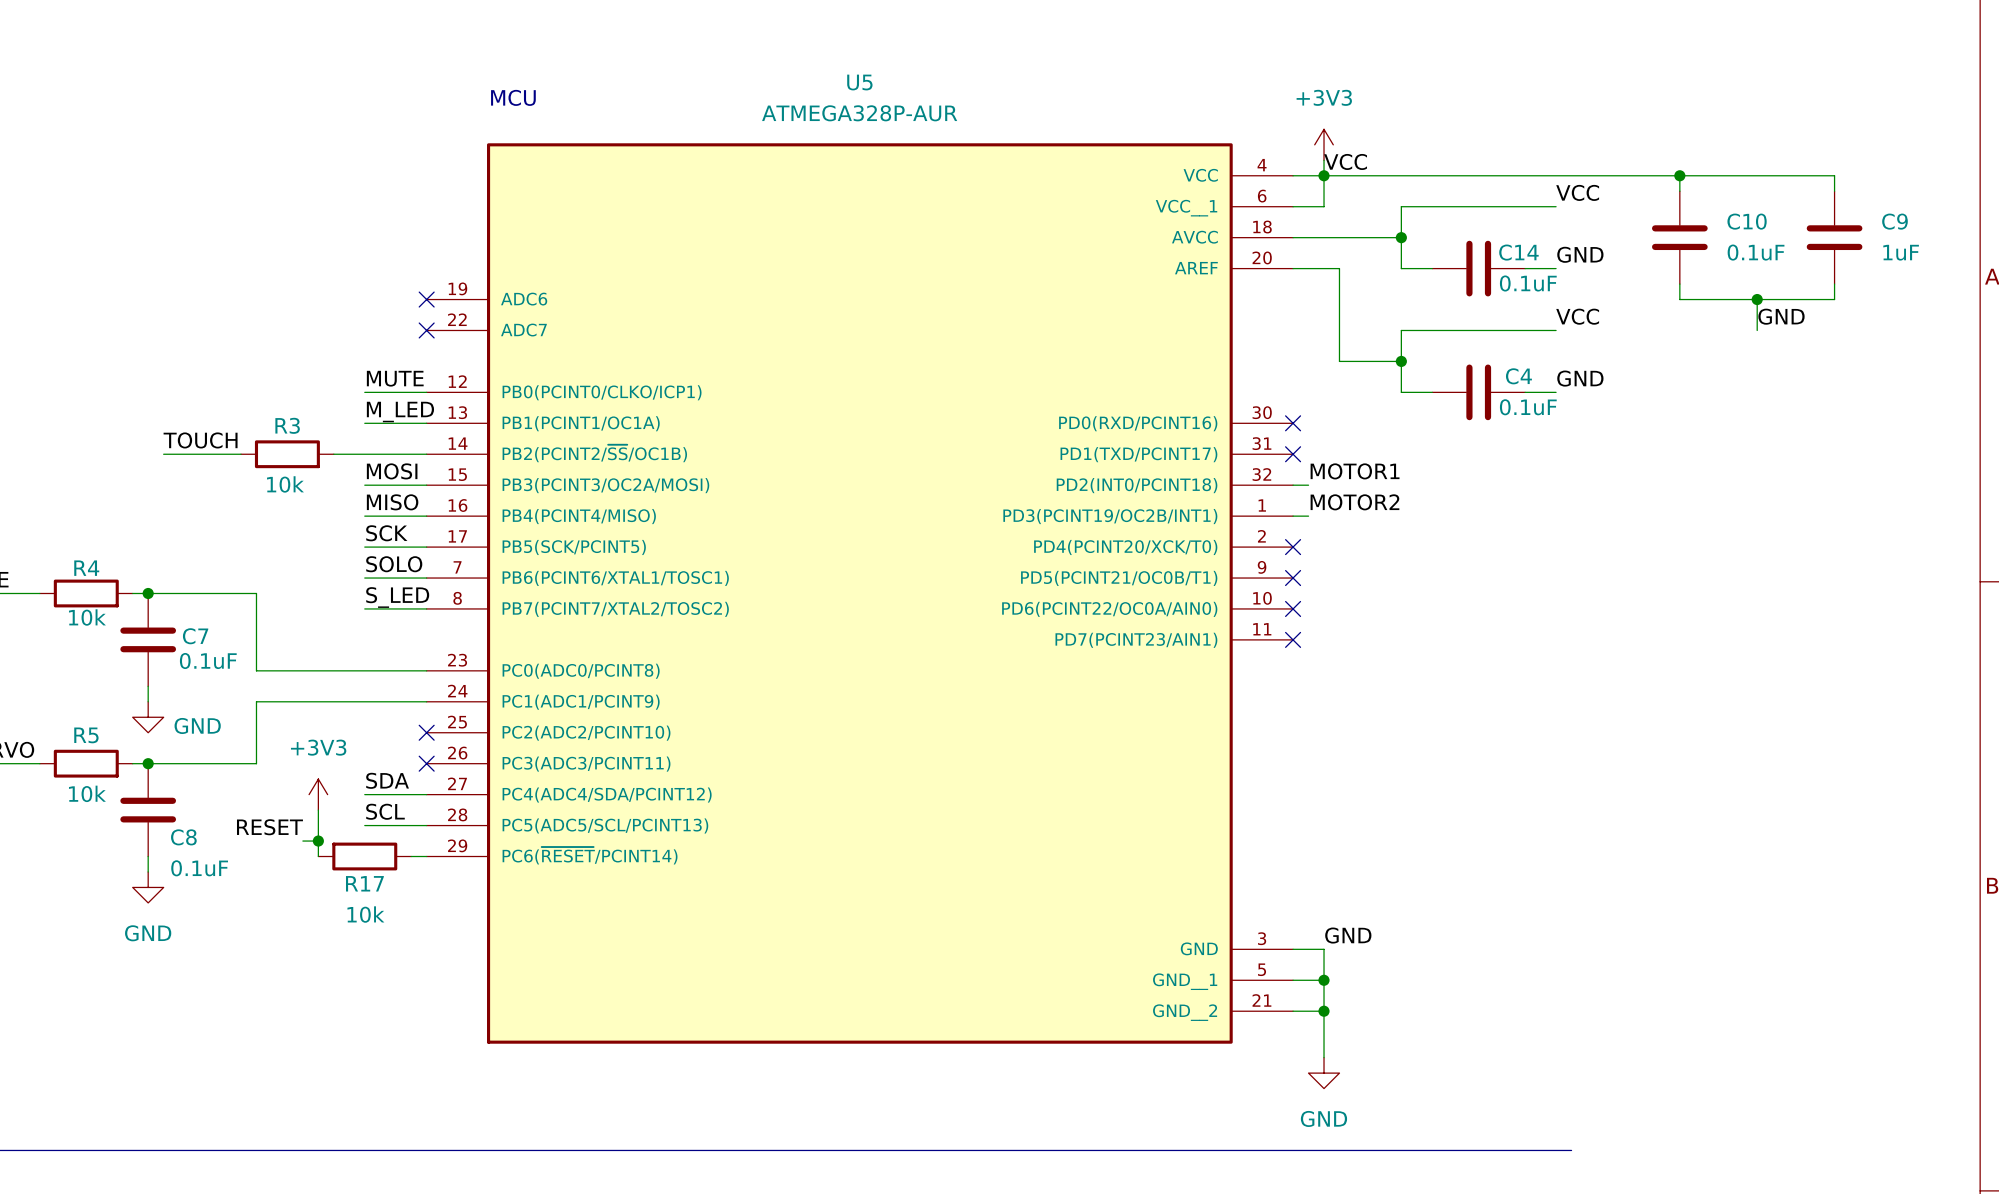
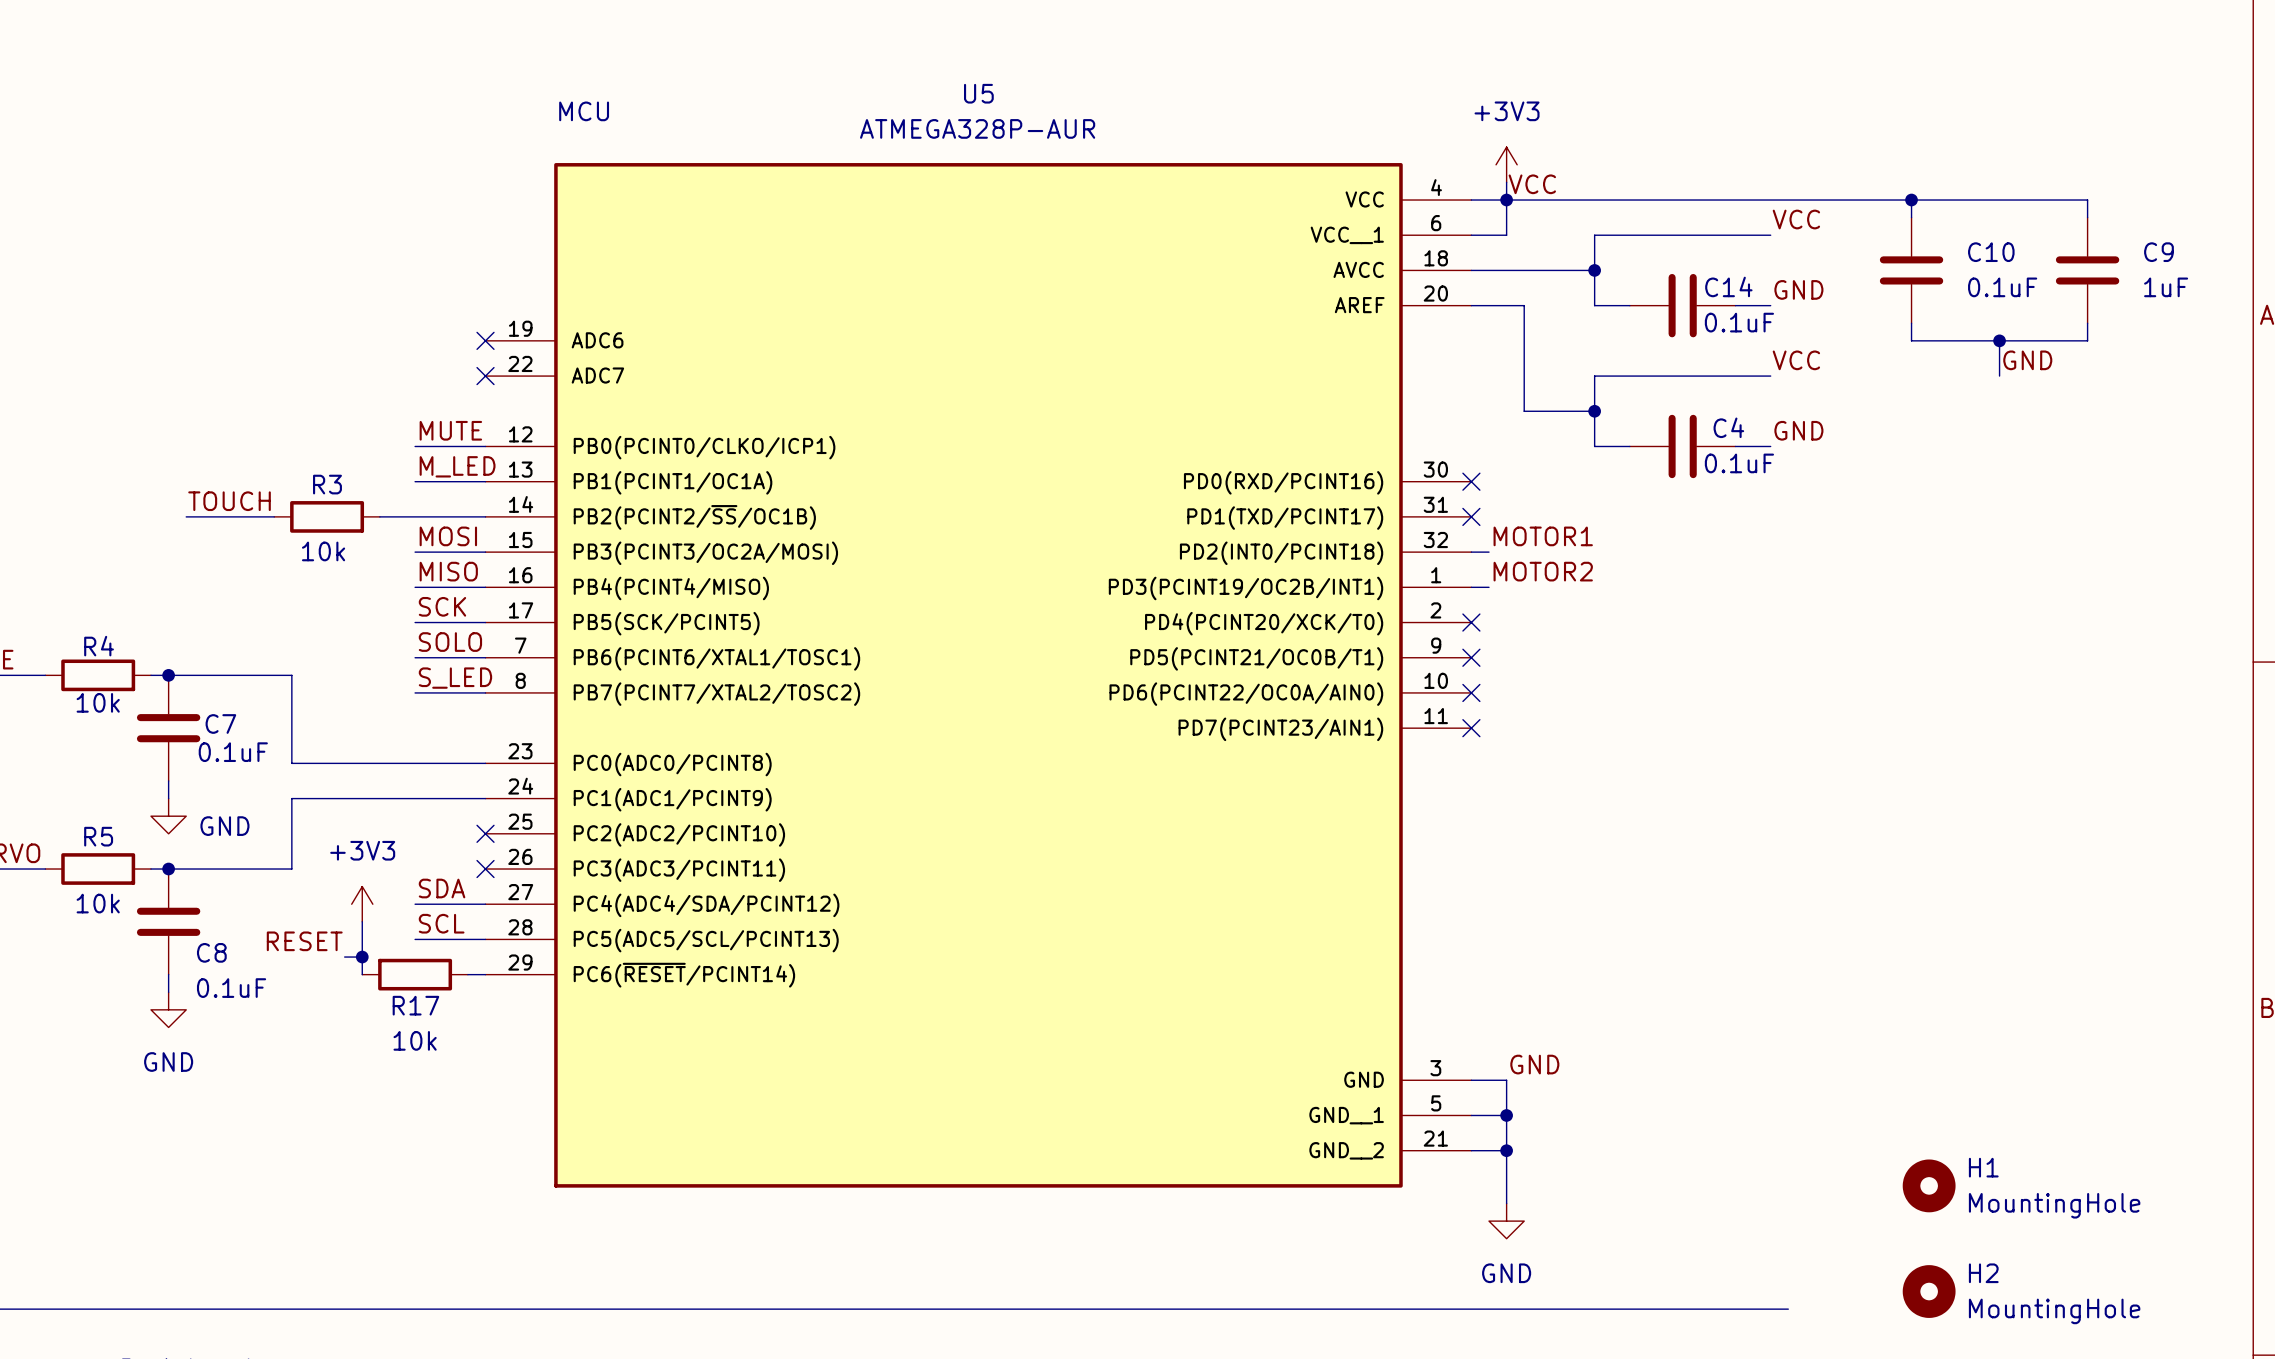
H1: none -> MountingHole (1929, 1185)
H2: none -> MountingHole (1929, 1291)

